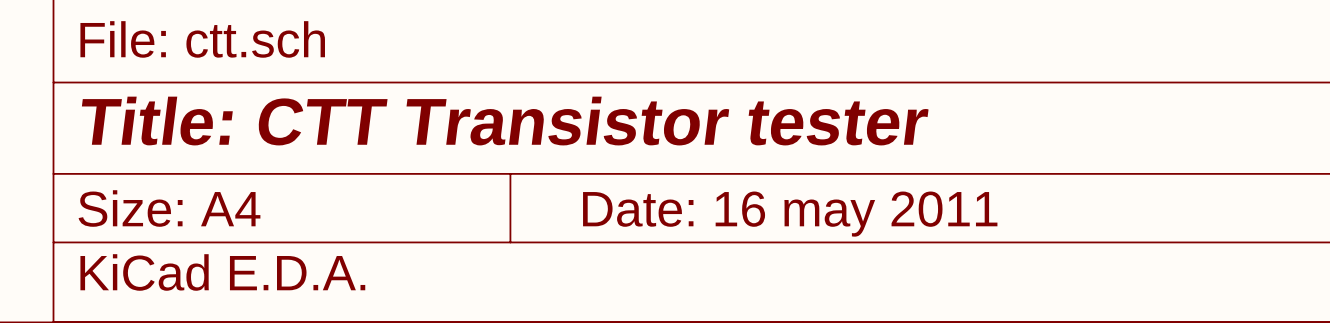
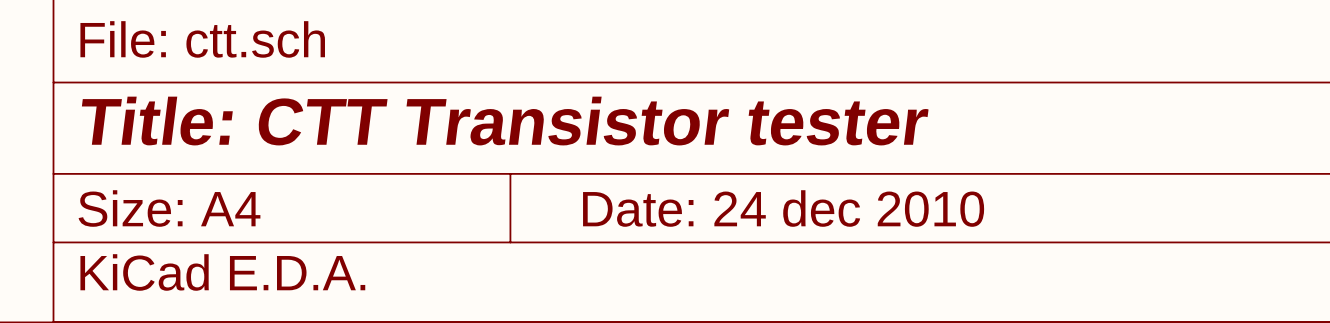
title block: Date: 16 may 2011 (790, 214) -> Date: 24 dec 2010 (783, 208)

